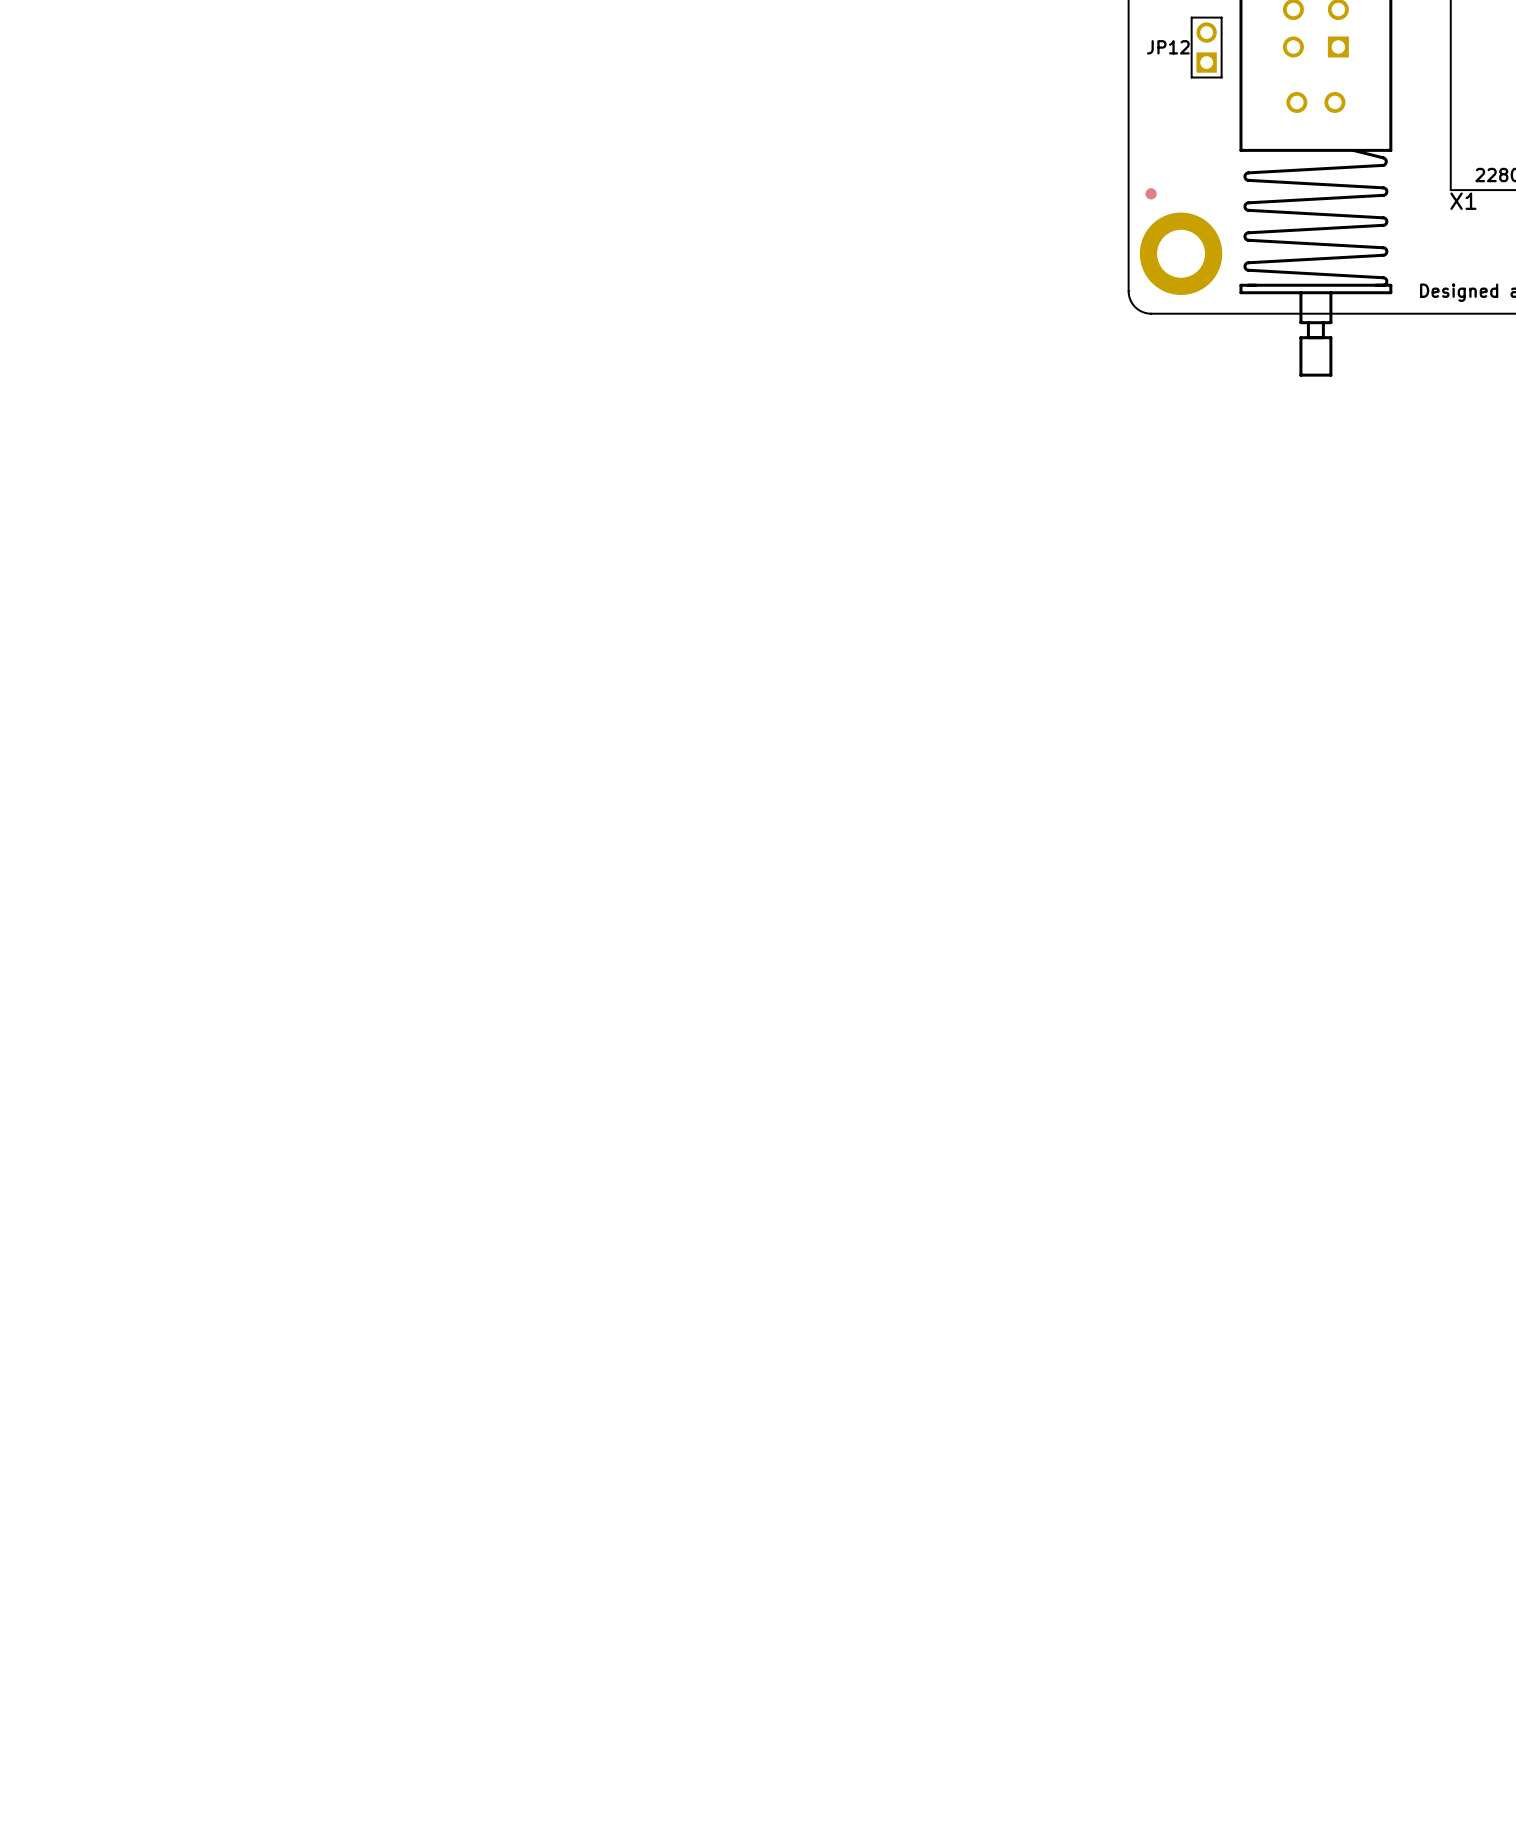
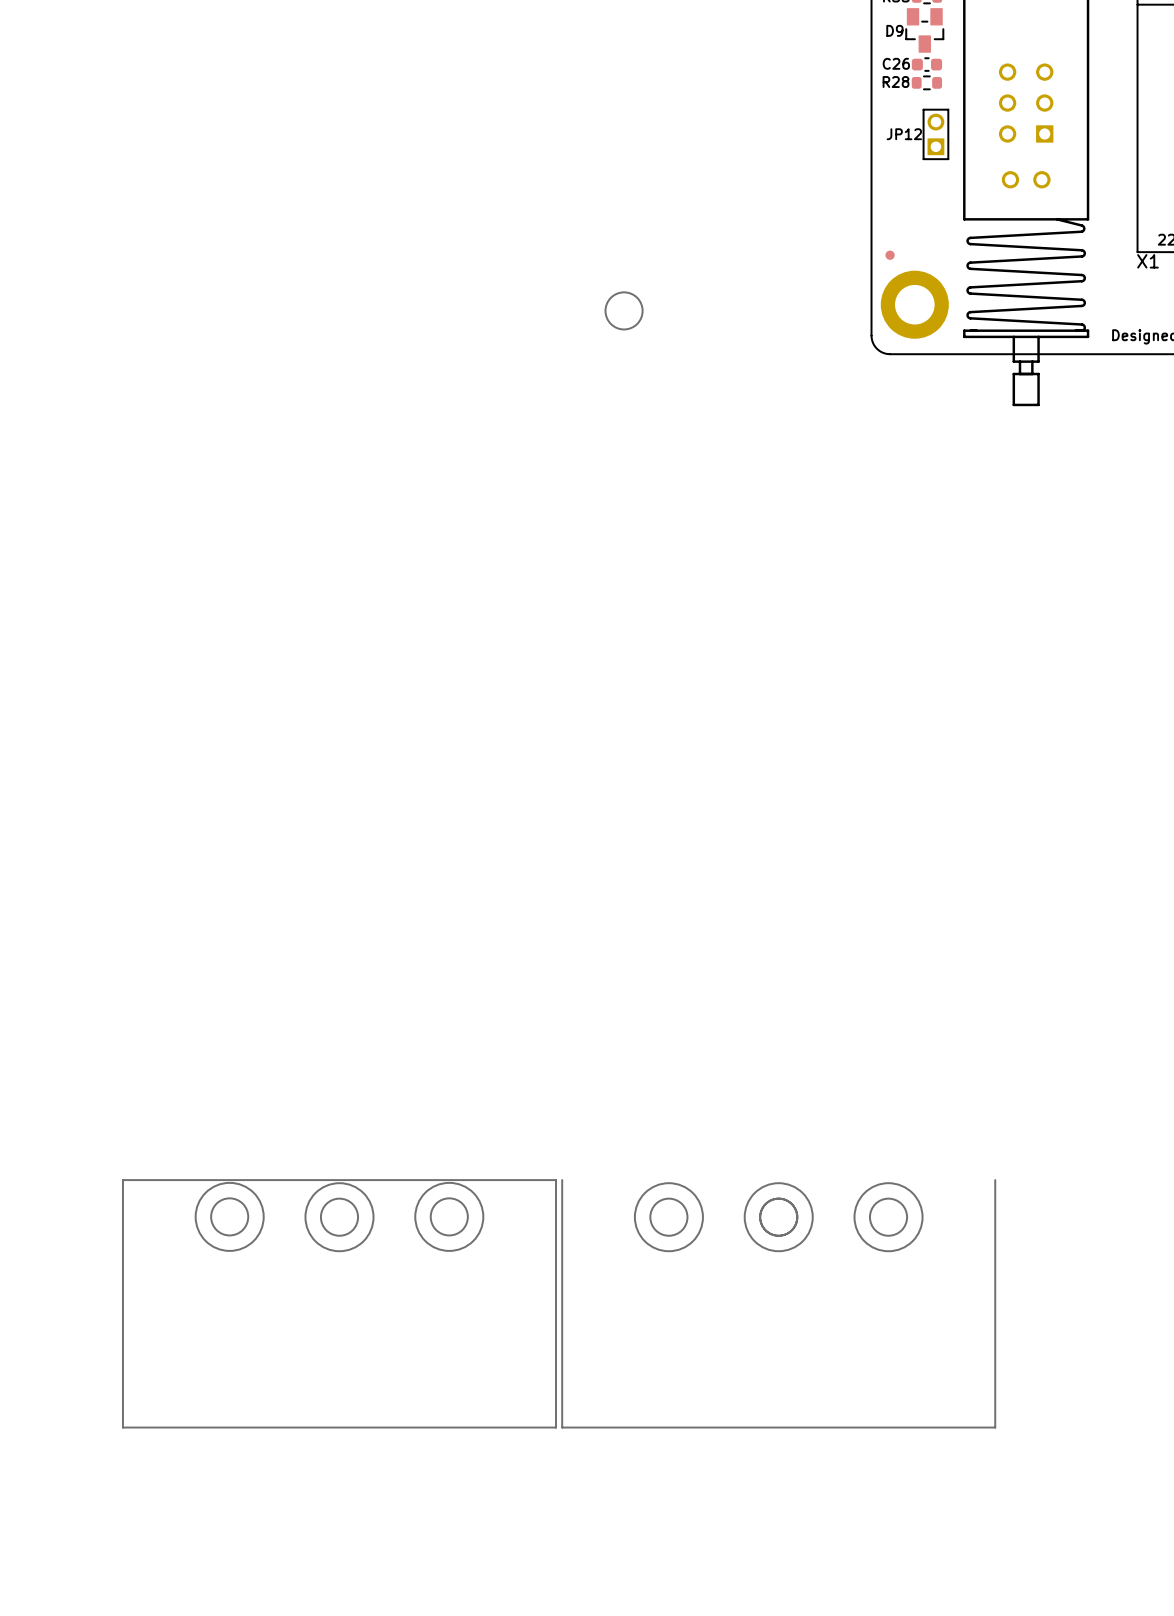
drawing: none -> [604, 291, 644, 331]
line: none -> (122, 1180) (122, 1427) (556, 1427) (556, 1180) (122, 1180)
line: none -> (562, 1180) (562, 1427) (995, 1427) (995, 1180)
drawing: none -> [195, 1182, 265, 1252]
drawing: none -> [304, 1182, 375, 1252]
drawing: none -> [414, 1182, 484, 1252]
drawing: none -> [634, 1182, 704, 1252]
drawing: none -> [744, 1182, 814, 1252]
drawing: none -> [853, 1182, 924, 1252]

